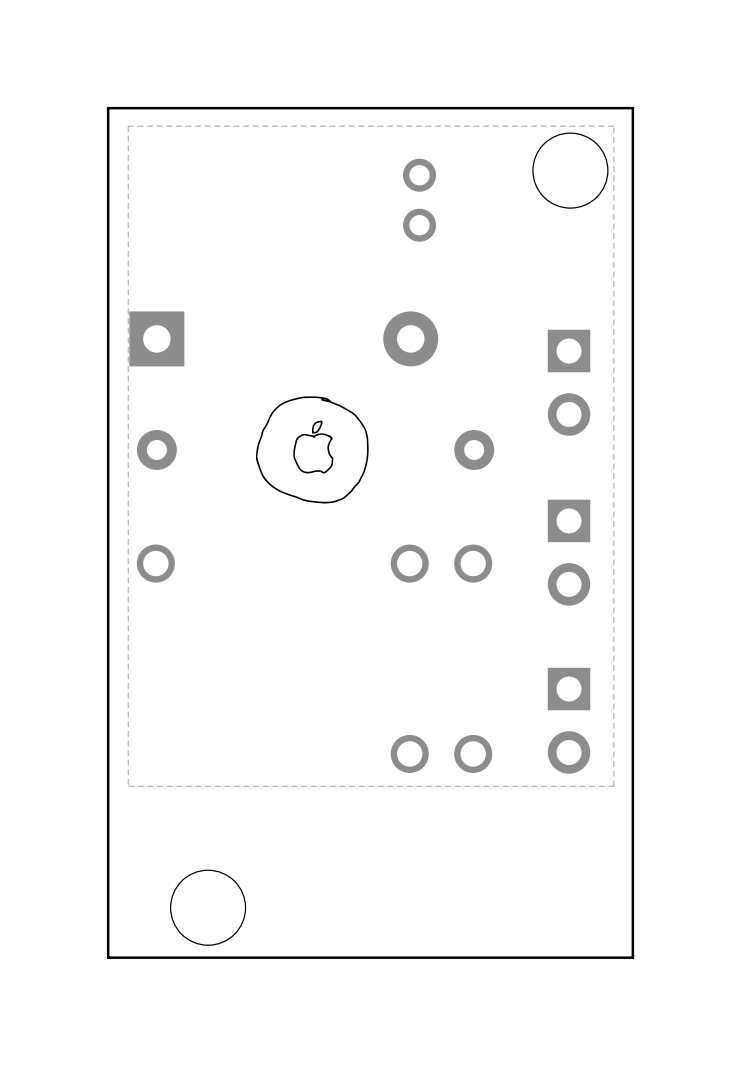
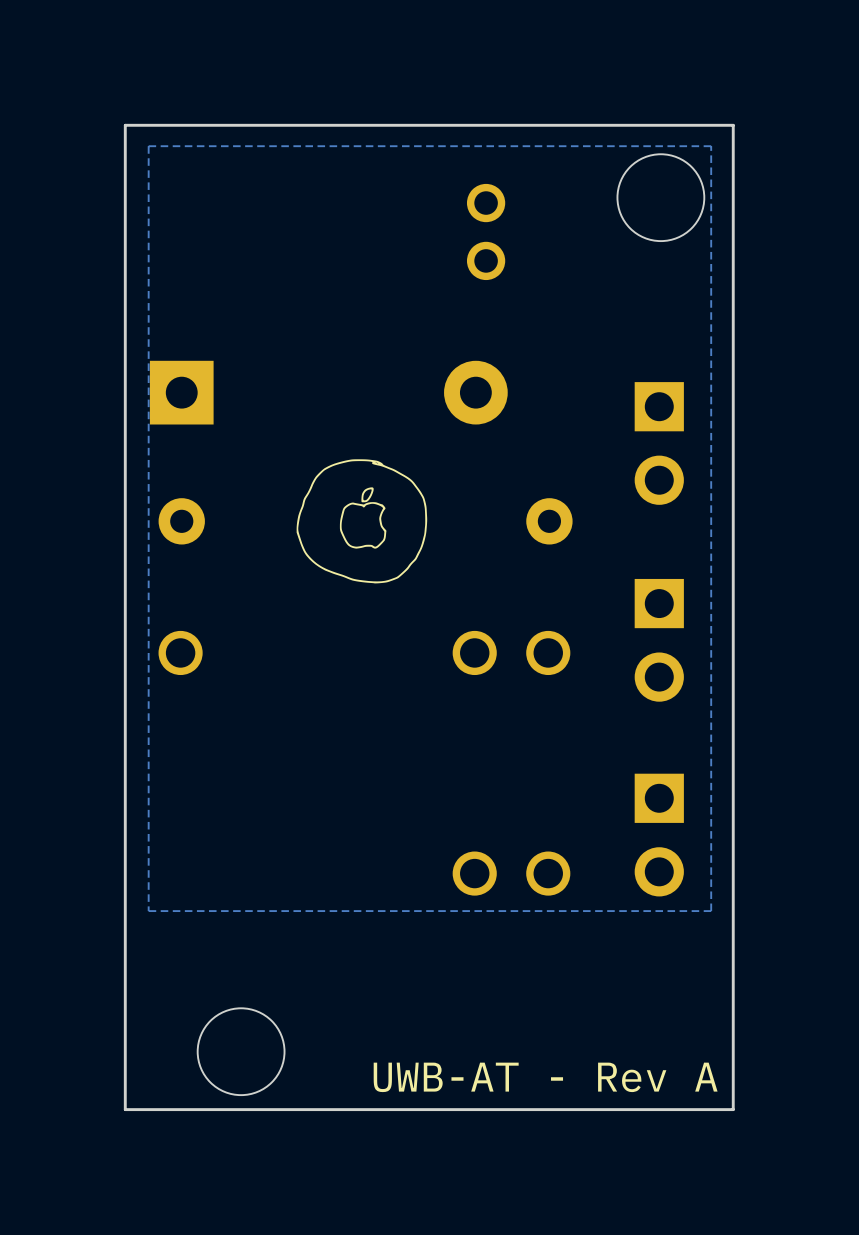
text: none -> UWB-AT - Rev A (545, 1077)

